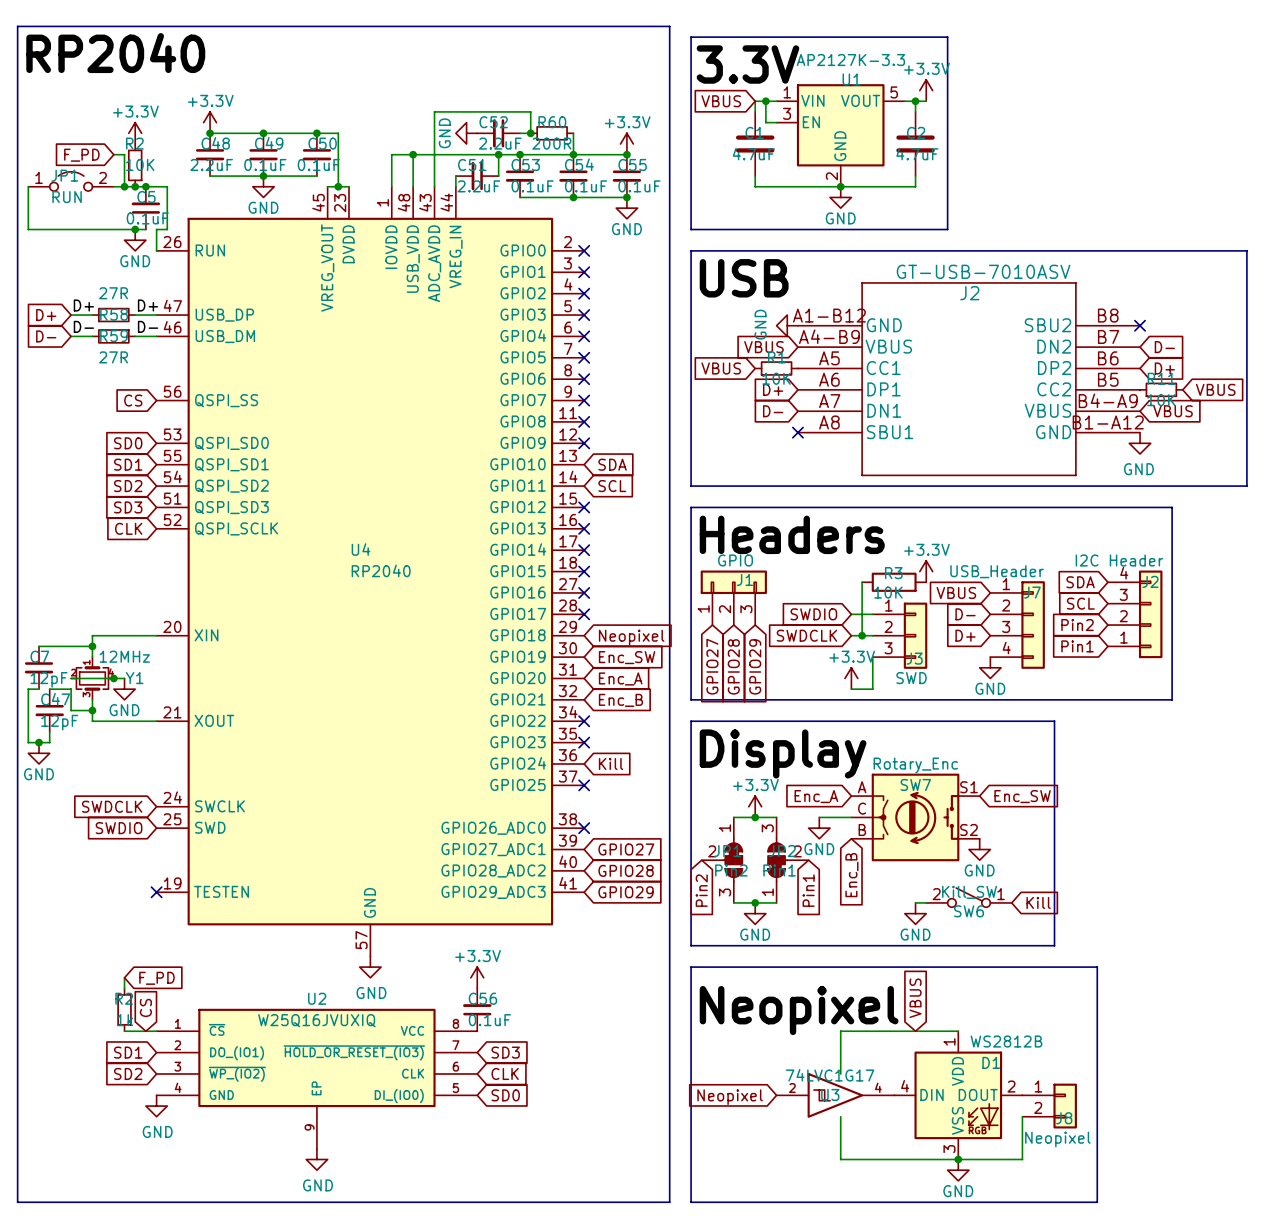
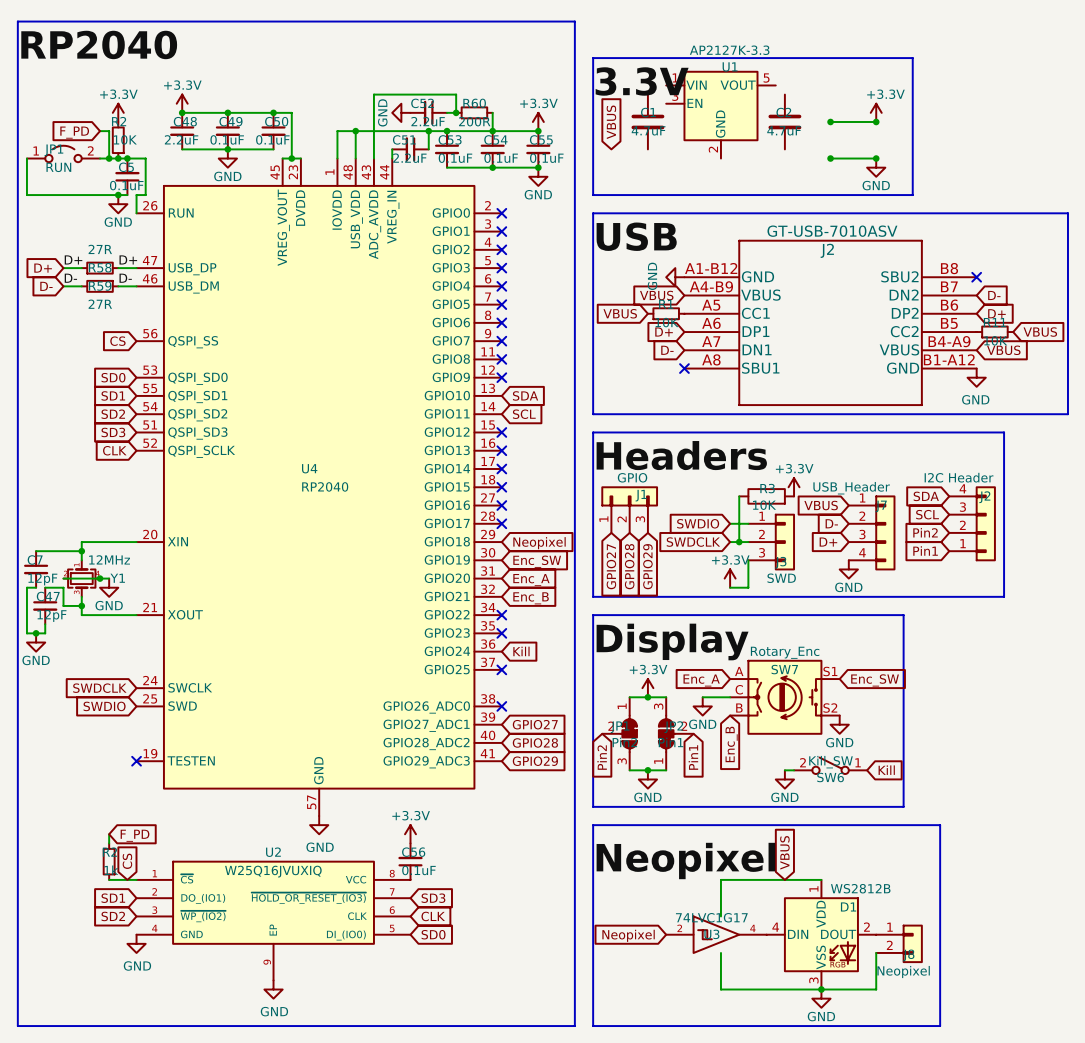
label position: 3.3V (747, 64) -> 3.3V (642, 81)
power symbol text position: +3.3V (926, 68) -> +3.3V (885, 94)
bus: (691, 69) (691, 37) (947, 37) (947, 229) -> (593, 58) (912, 58) (912, 195) (812, 195)
power symbol position: +3.3V (926, 90) -> +3.3V (876, 112)
global label rotation: 0° (721, 101) -> 90° clockwise (611, 122)
wire: (765, 101) (765, 122) (776, 122) -> none
junction: (765, 101) -> none
wire: (776, 101) (755, 101) (755, 111) -> none
wire: (904, 101) (926, 101) -> none
wire: (915, 101) (915, 111) -> none
junction: (915, 101) -> none
wire: none -> (830, 121) (876, 121)
junction: none -> (830, 121)
junction: none -> (876, 121)
wire: (755, 176) (755, 186) (915, 186) (915, 176) -> none
junction: (840, 186) -> none
wire: none -> (830, 158) (876, 158)
junction: none -> (830, 158)
junction: none -> (876, 158)
power symbol position: GND (840, 197) -> GND (876, 167)

